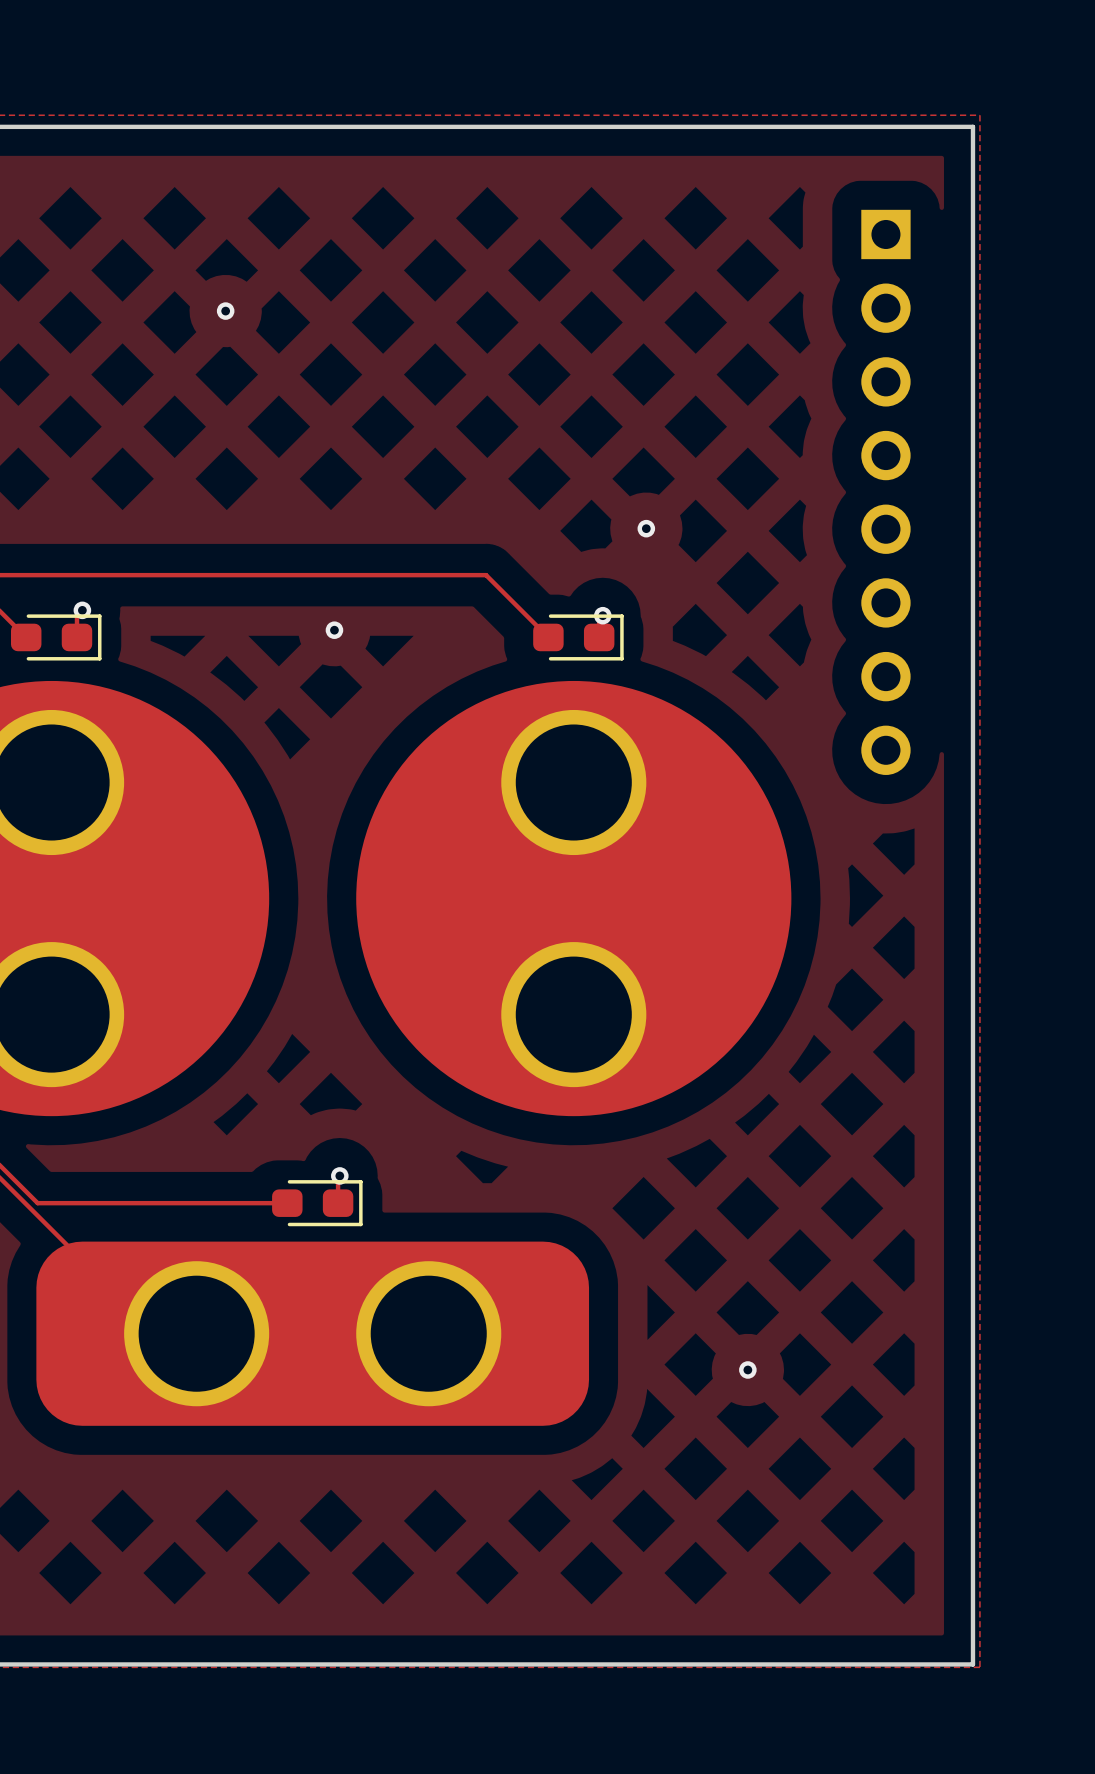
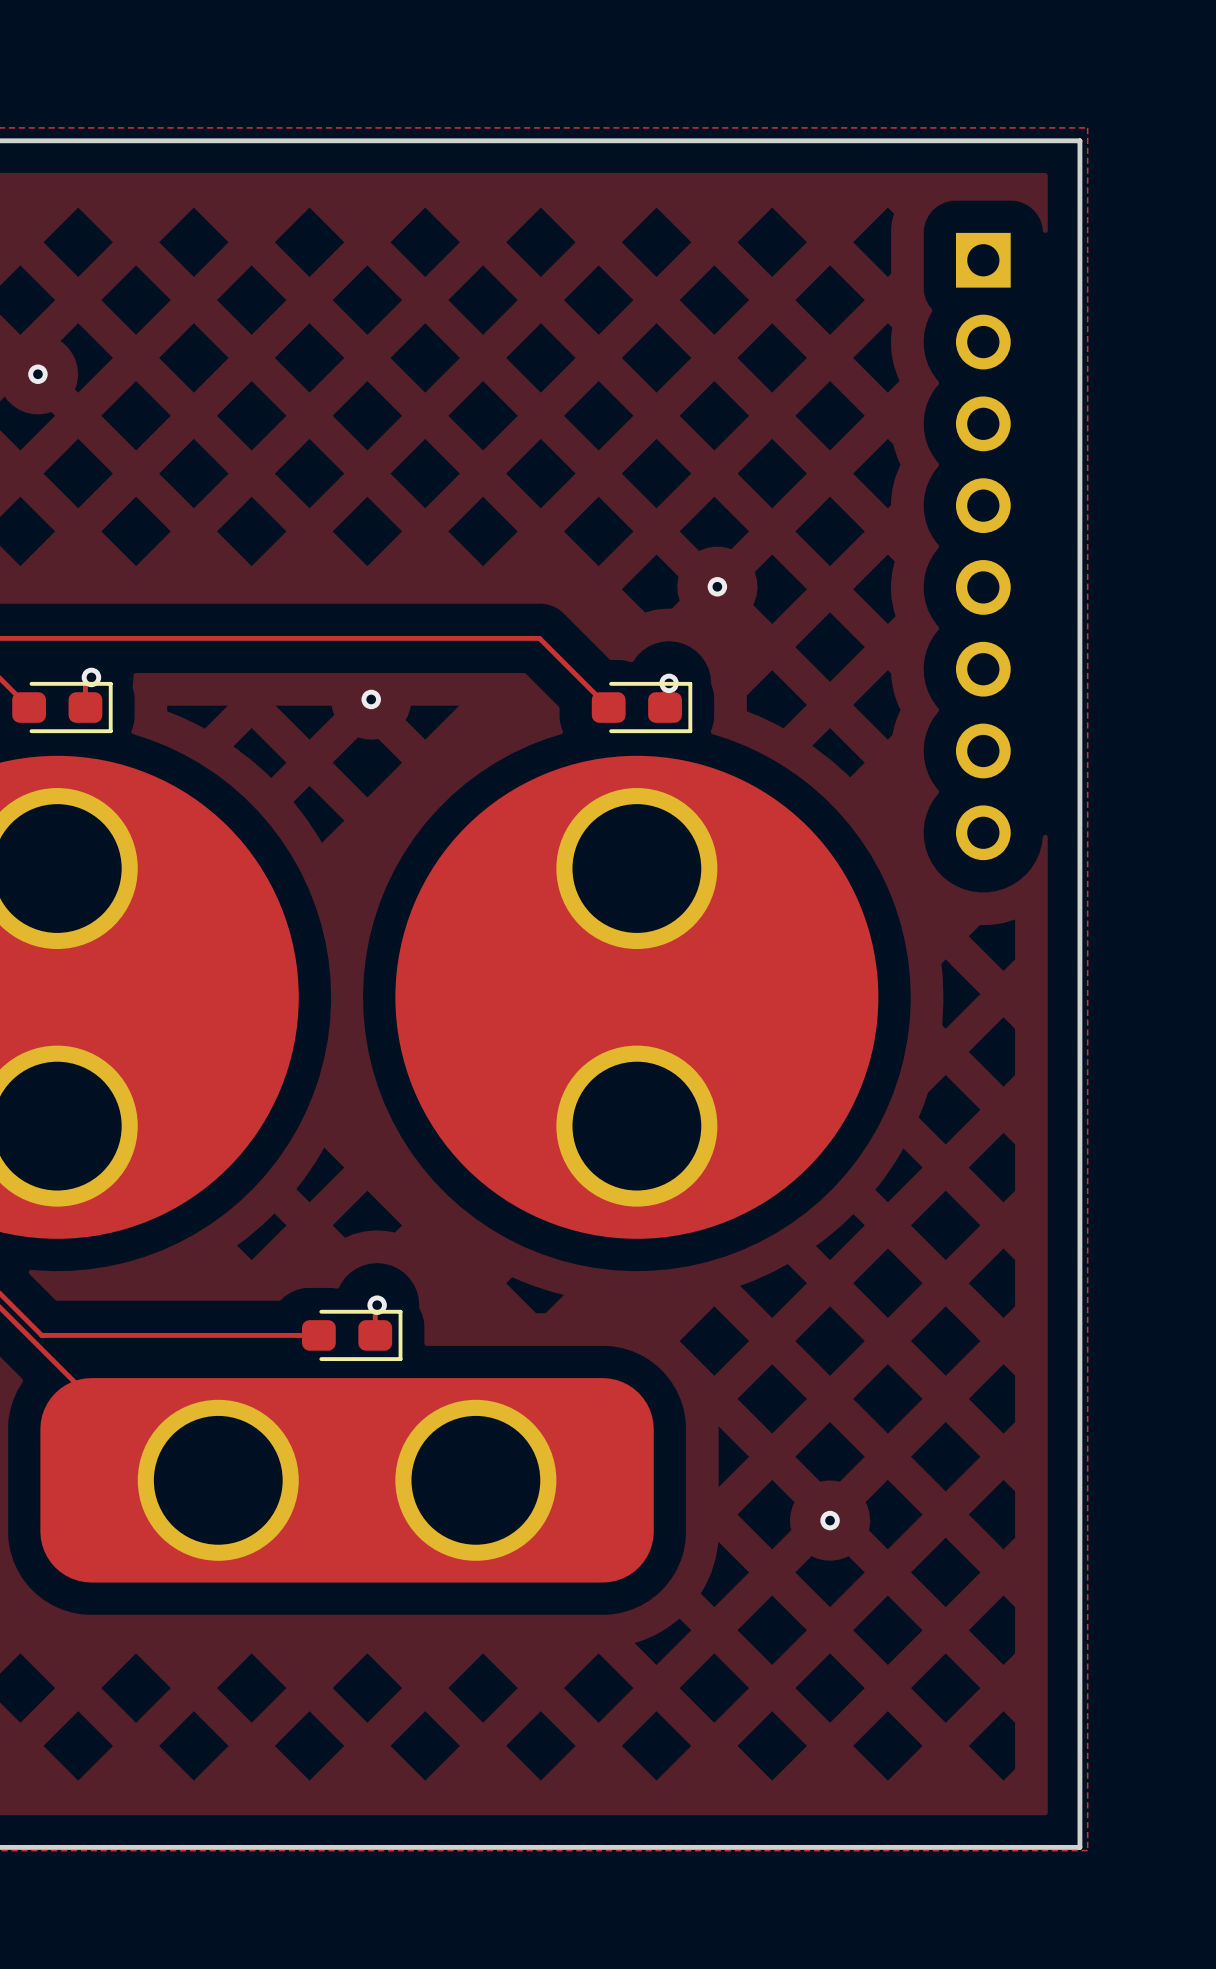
via: (225, 311) -> none
via: none -> (37, 374)

